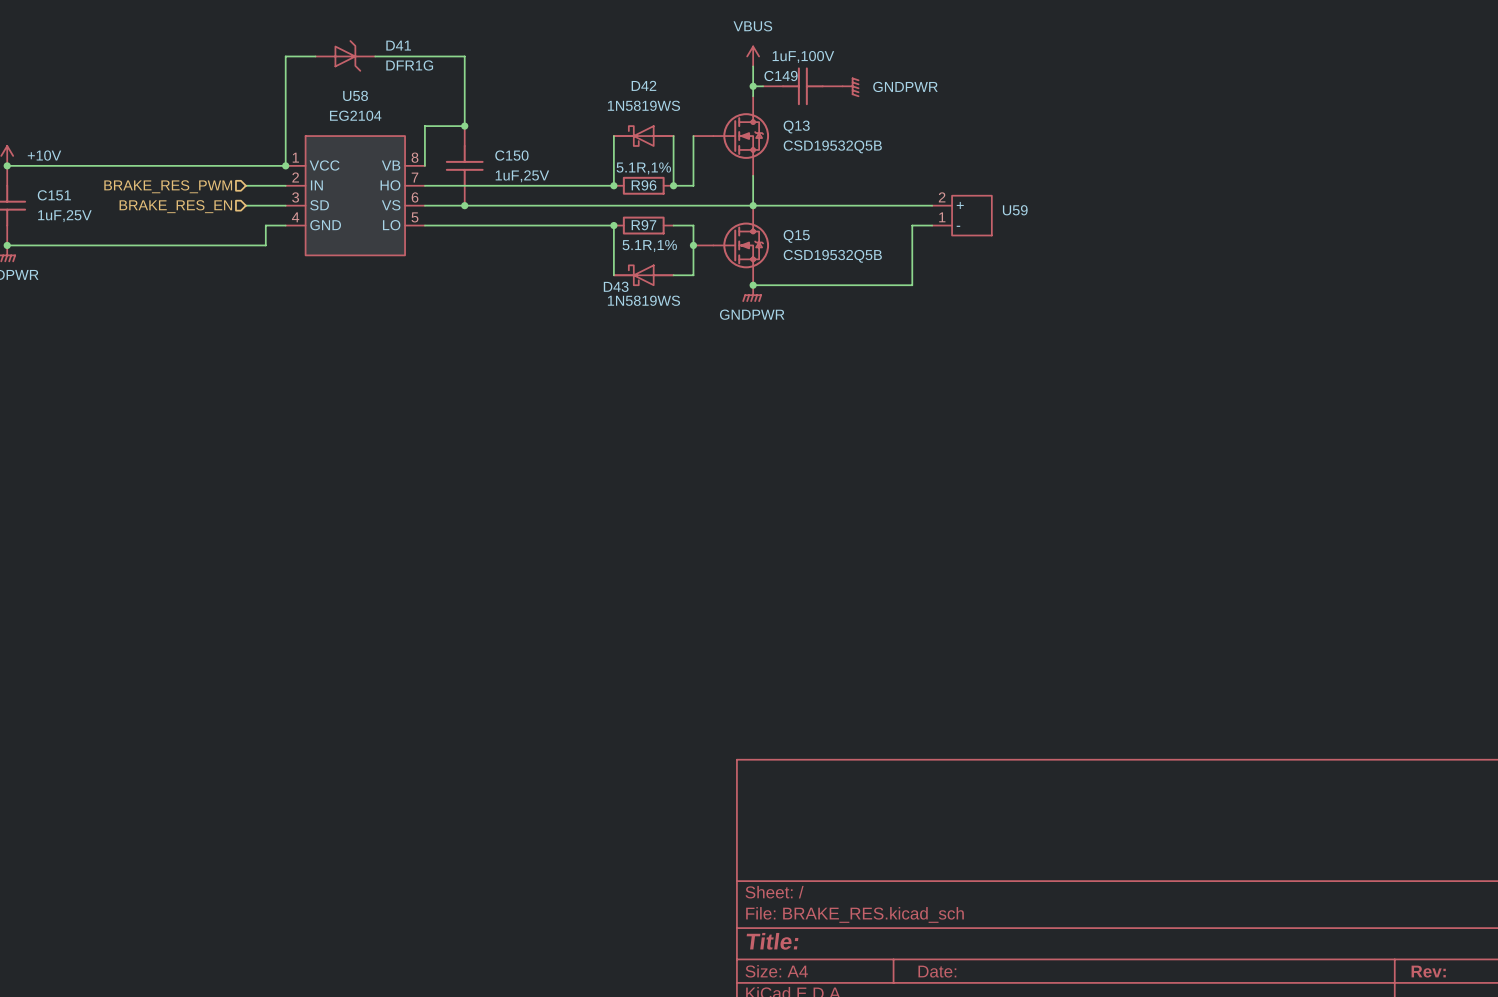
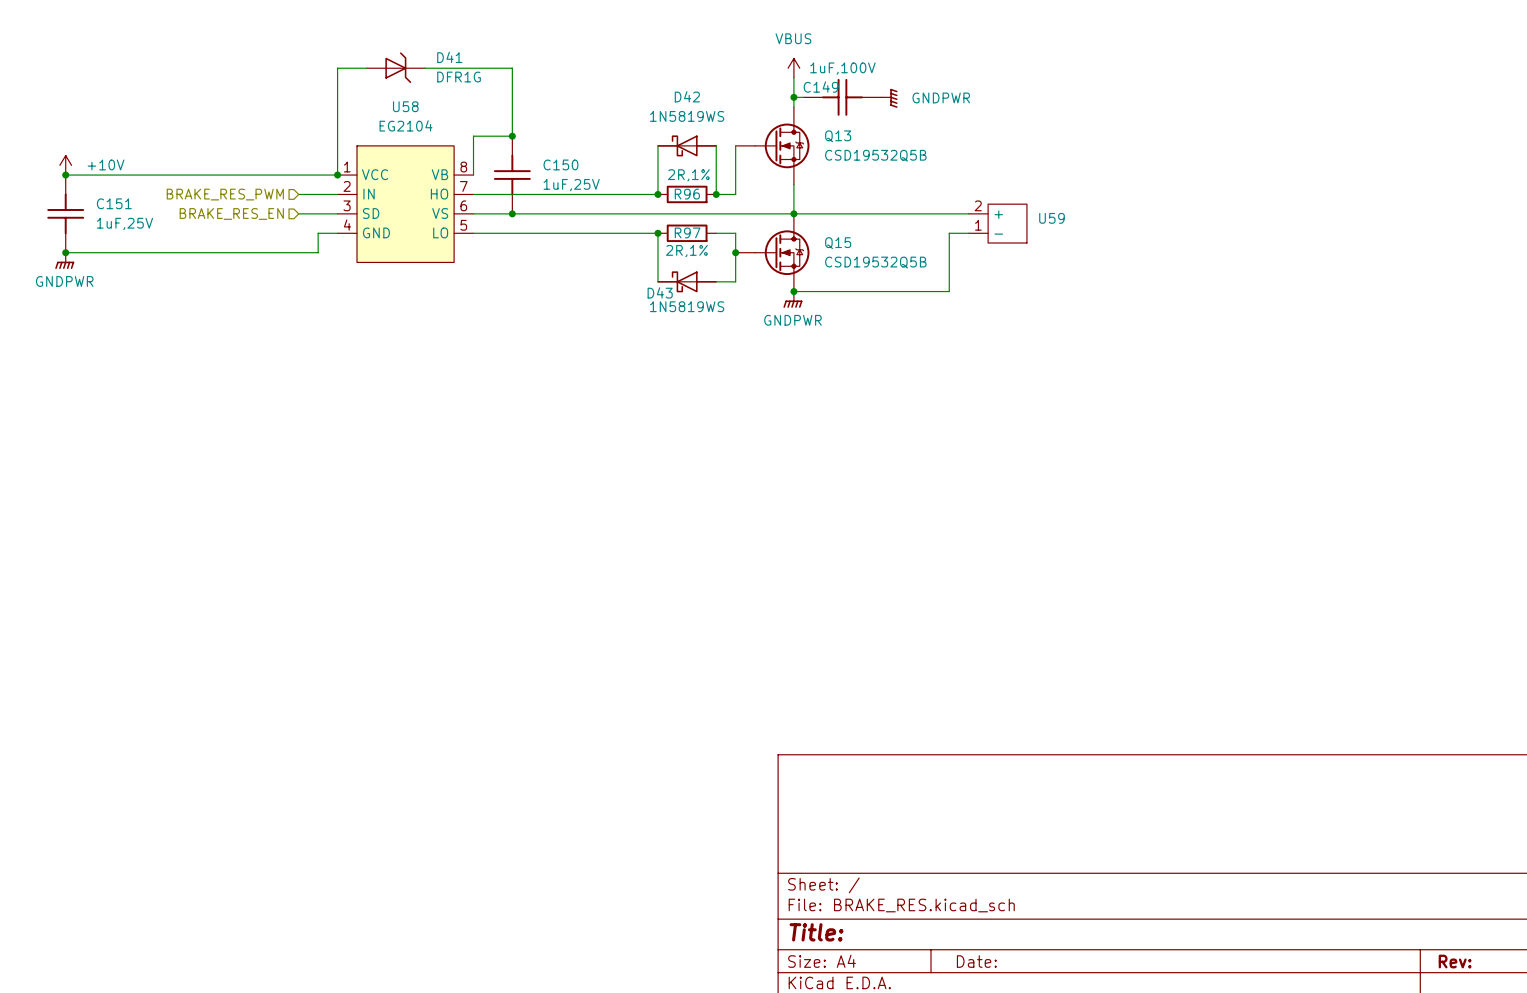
R96 value: 5.1R,1% (643, 168) -> 2R,1% (688, 175)
R97 value: 5.1R,1% (649, 245) -> 2R,1% (686, 251)

